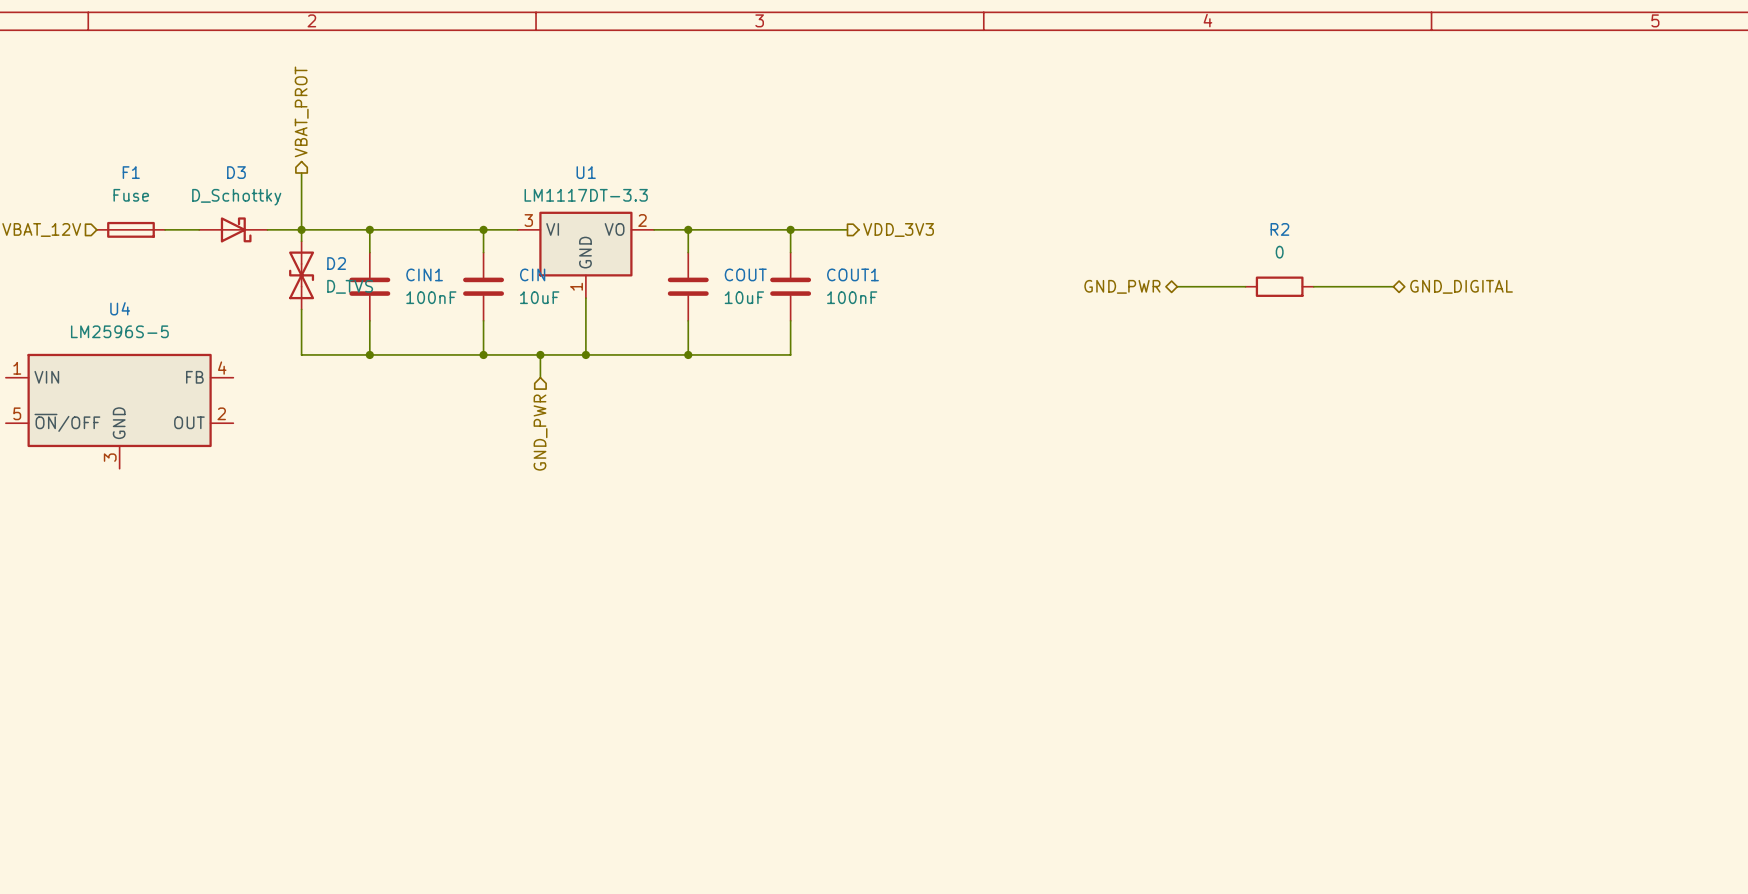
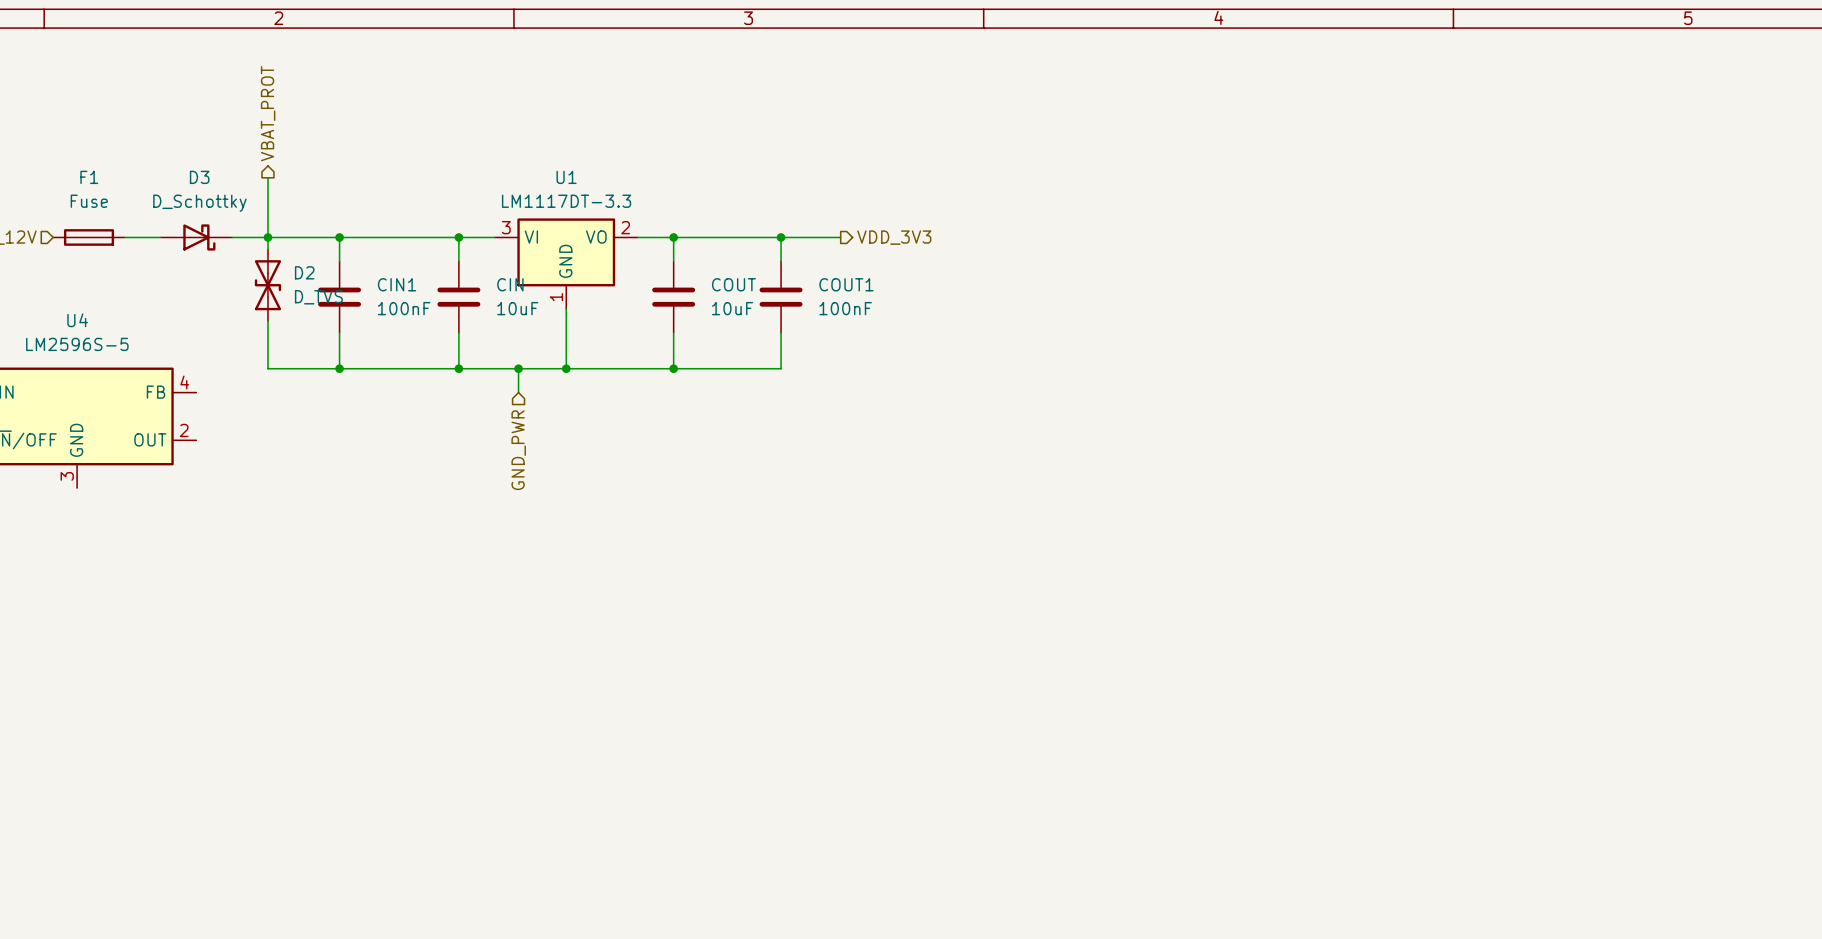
hierarchical label: GND_PWR (1122, 286) -> none
wire: (1177, 286) (1245, 286) -> none
R2: 0 (1279, 286) -> none
wire: (1313, 286) (1393, 286) -> none
hierarchical label: GND_DIGITAL (1461, 286) -> none

